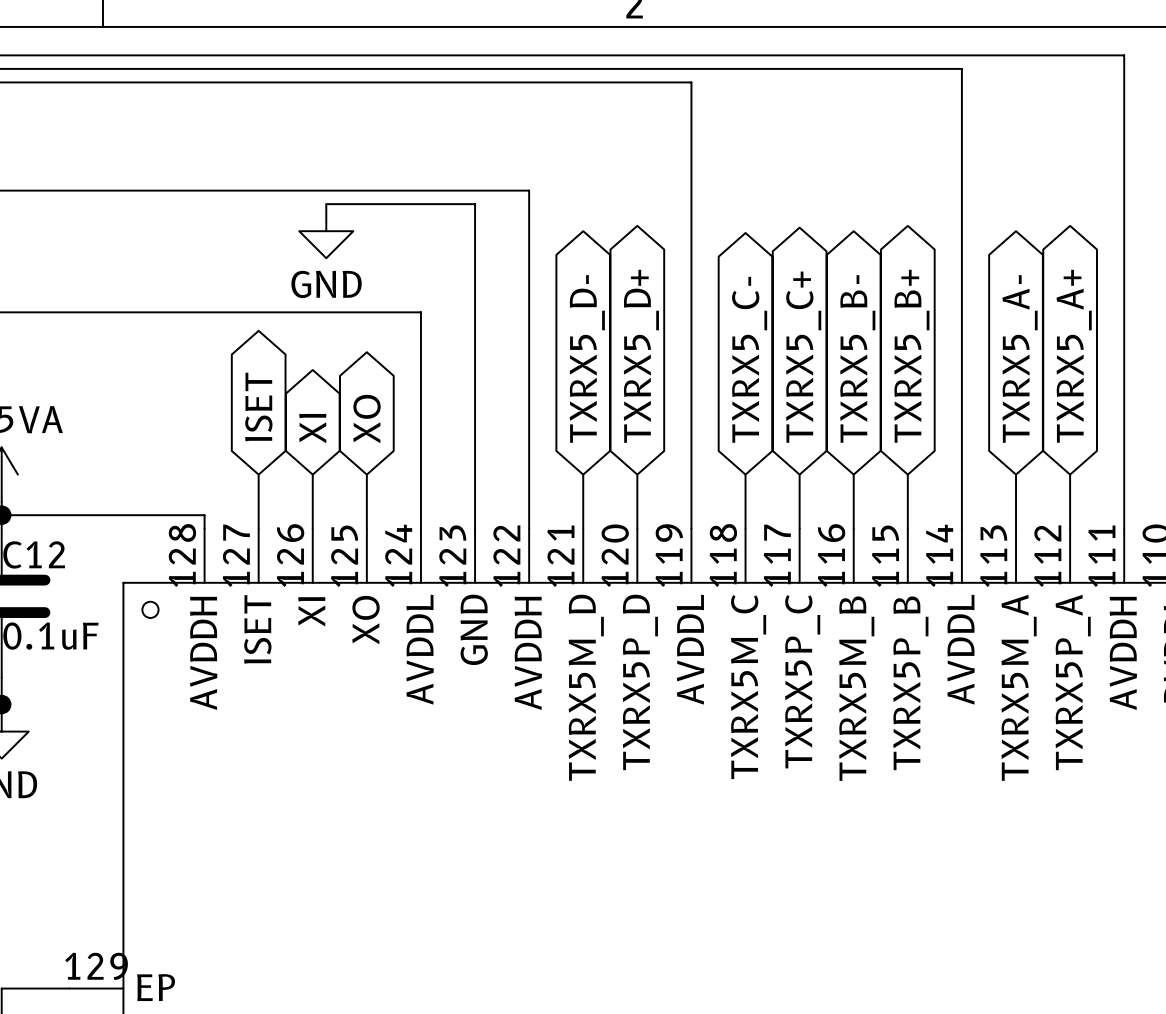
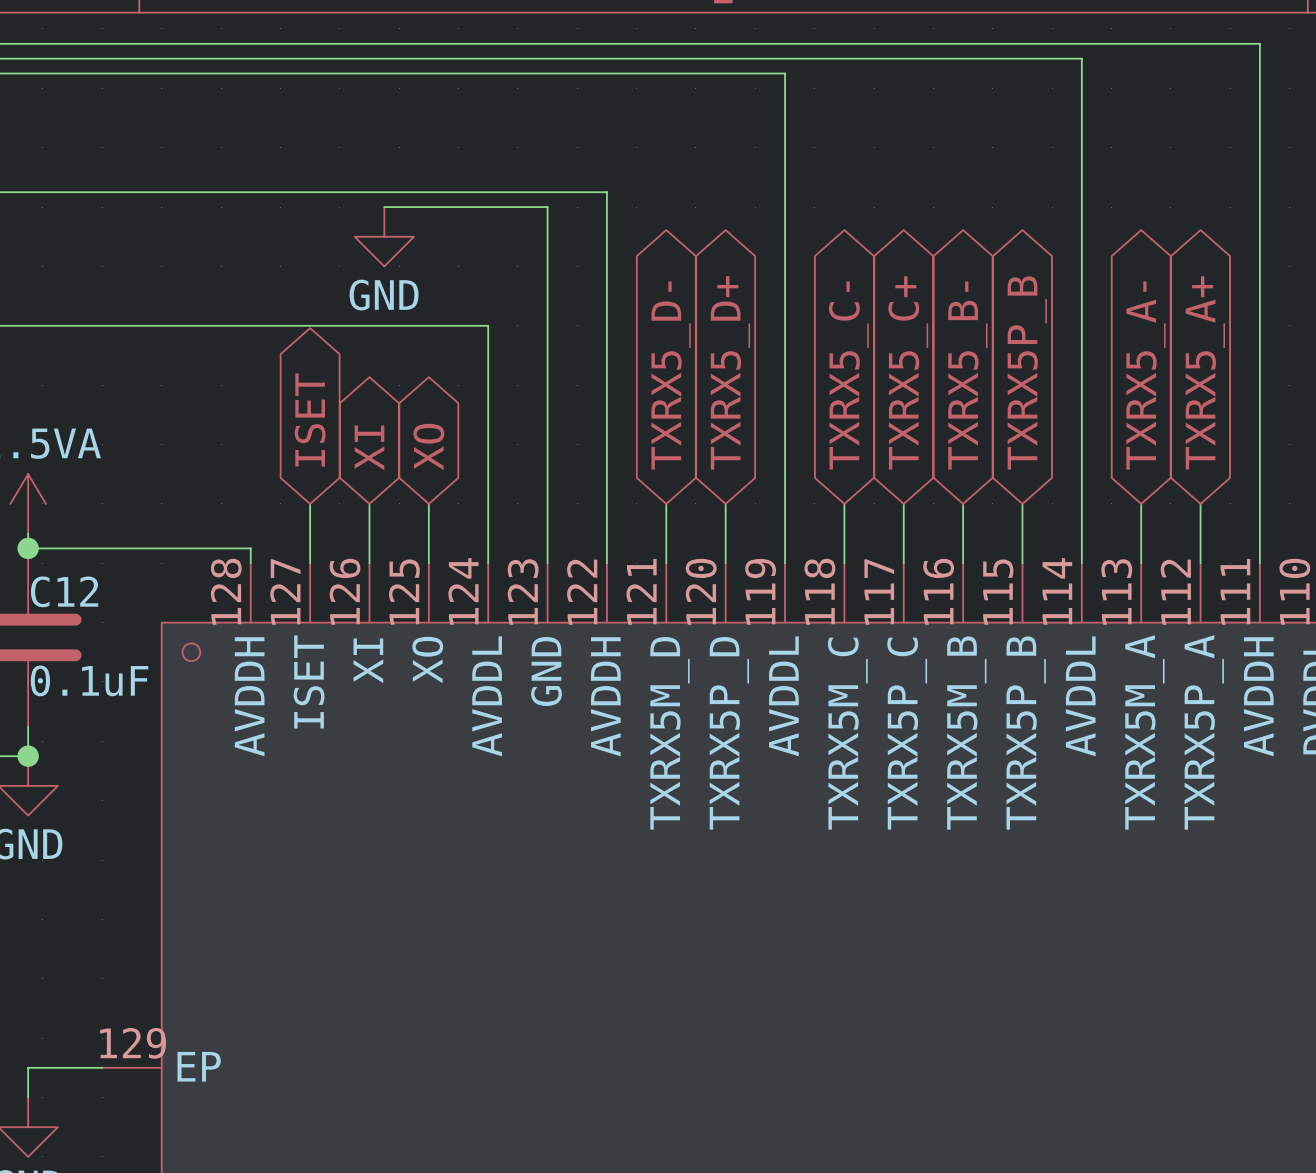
global label: TXRX5_B+ (911, 356) -> TXRX5P_B (1027, 372)

